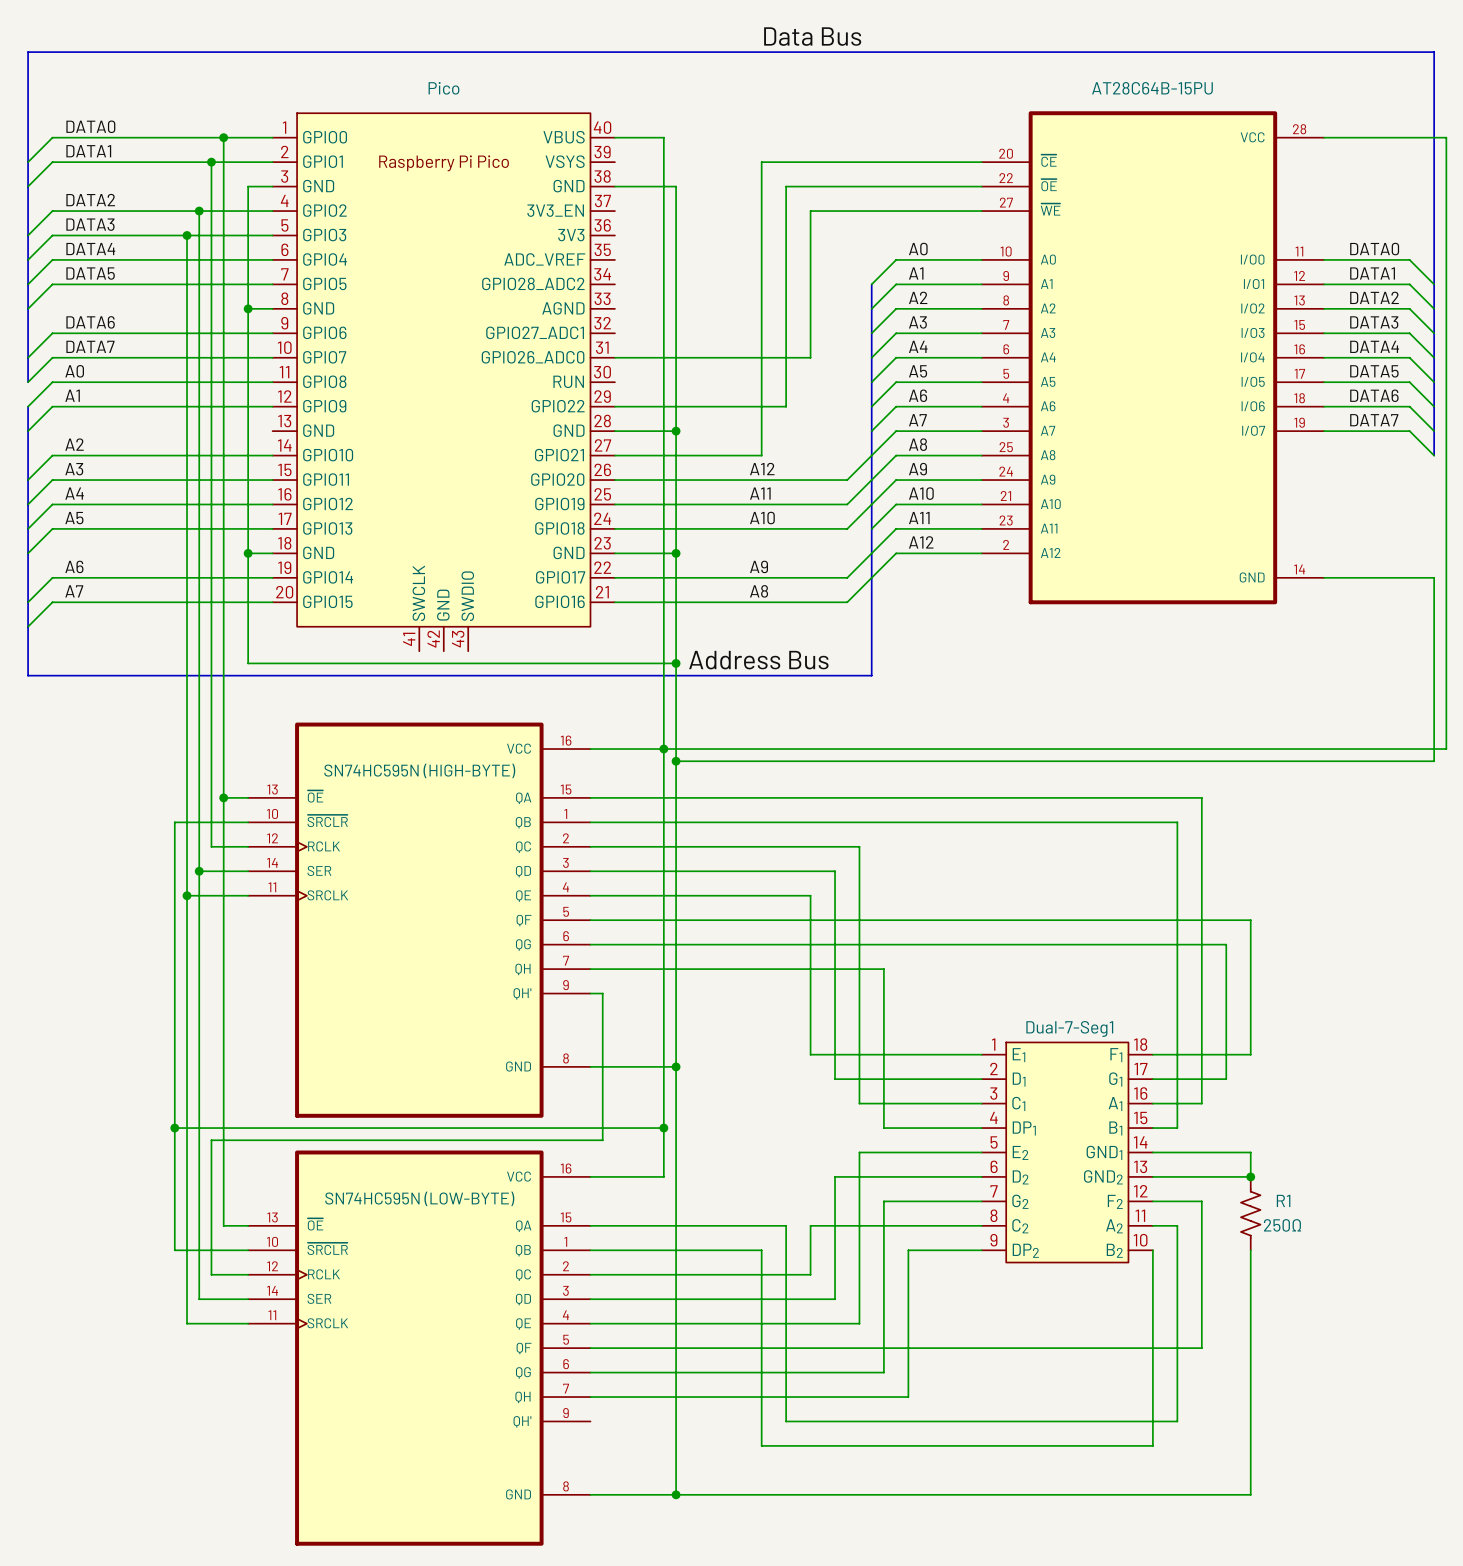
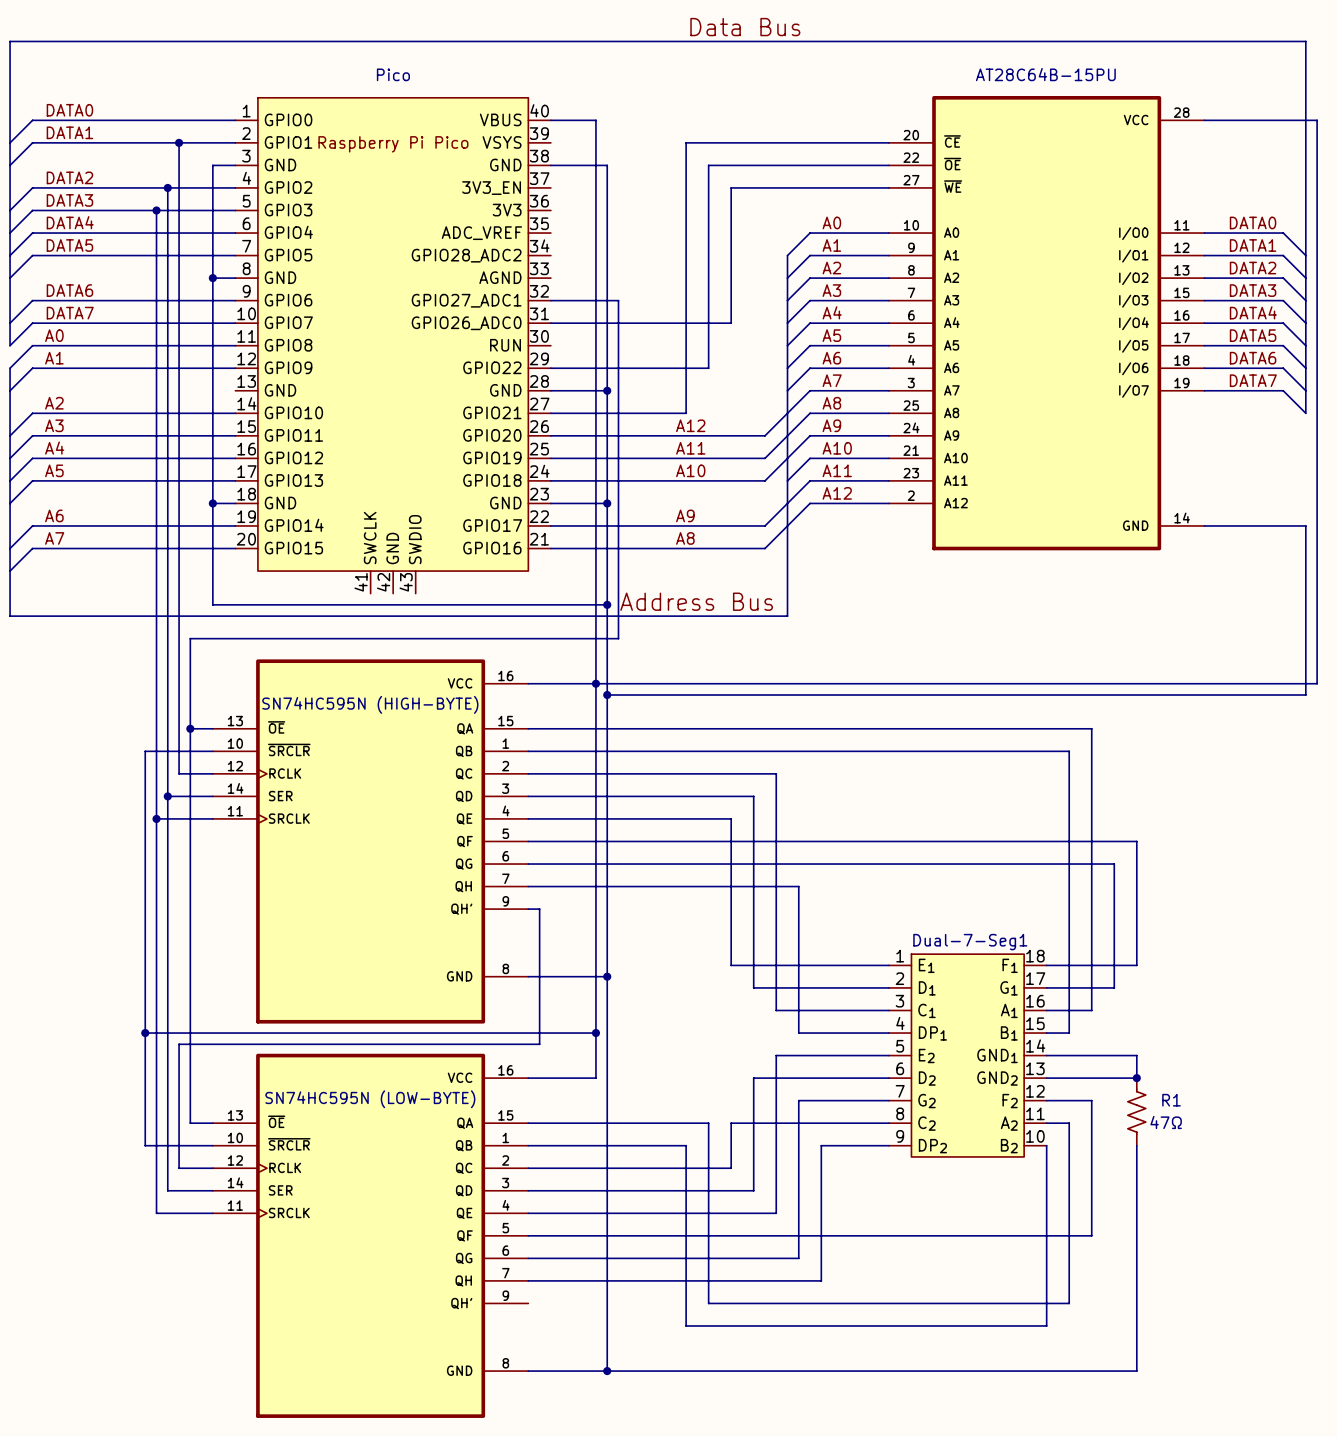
wire: (223, 137) (223, 700) -> (550, 300) (618, 300) (618, 638) (190, 638)
junction: (223, 137) -> none
R1 value: 250Ω (1282, 1225) -> 47Ω (1166, 1122)

